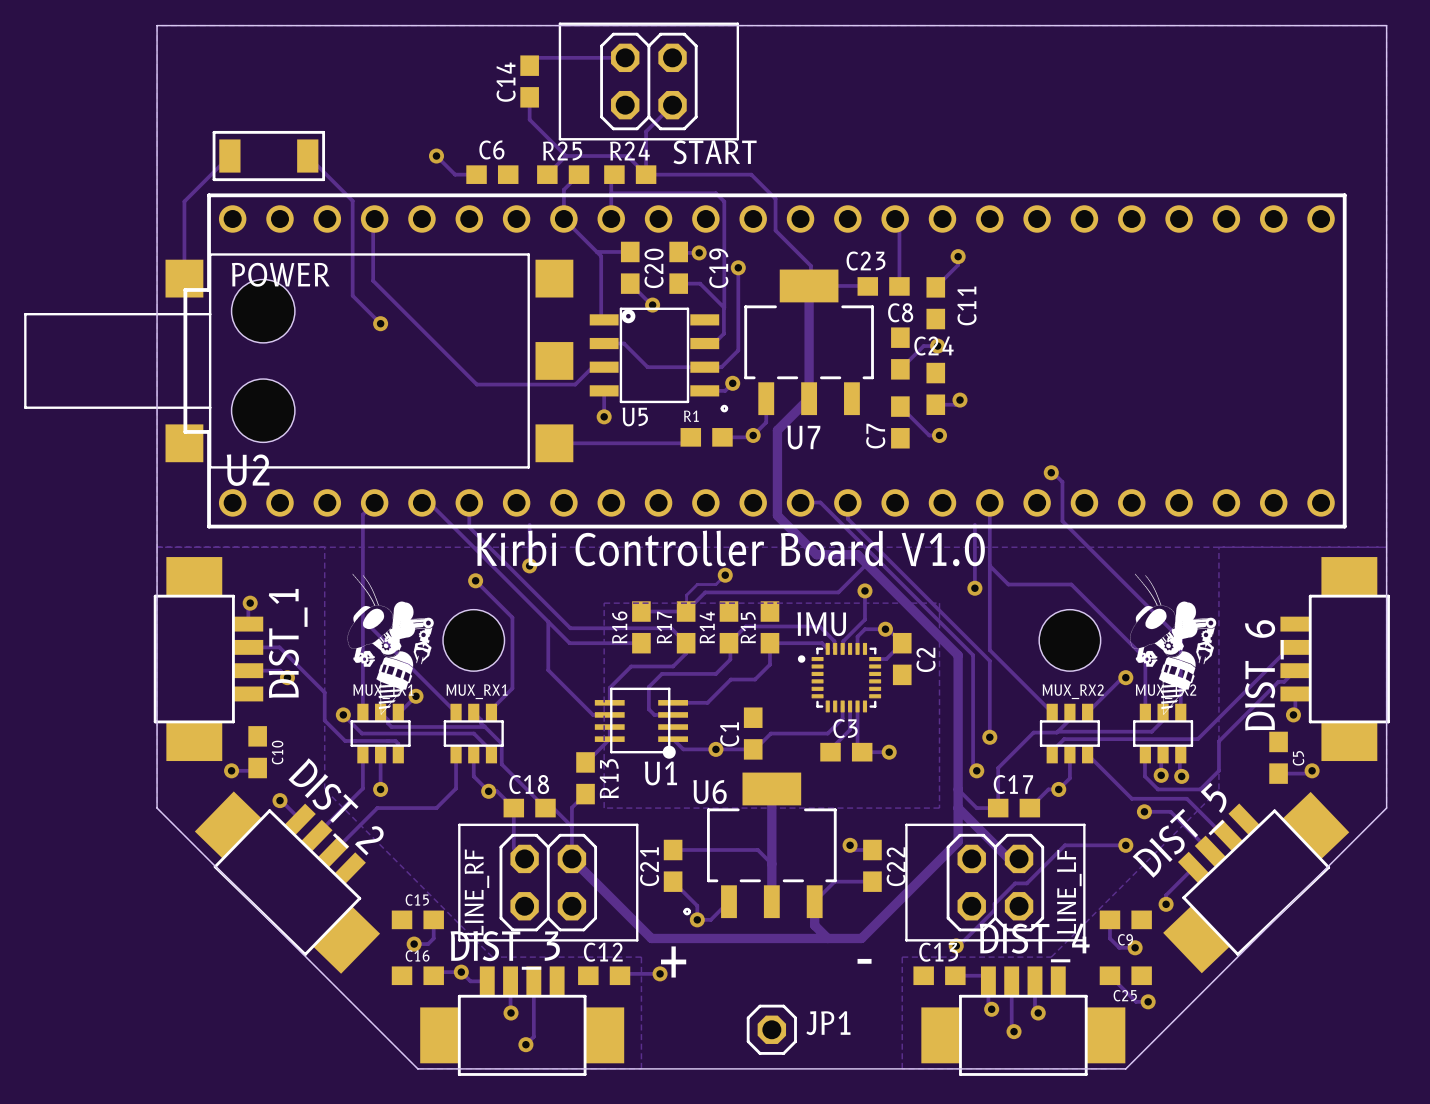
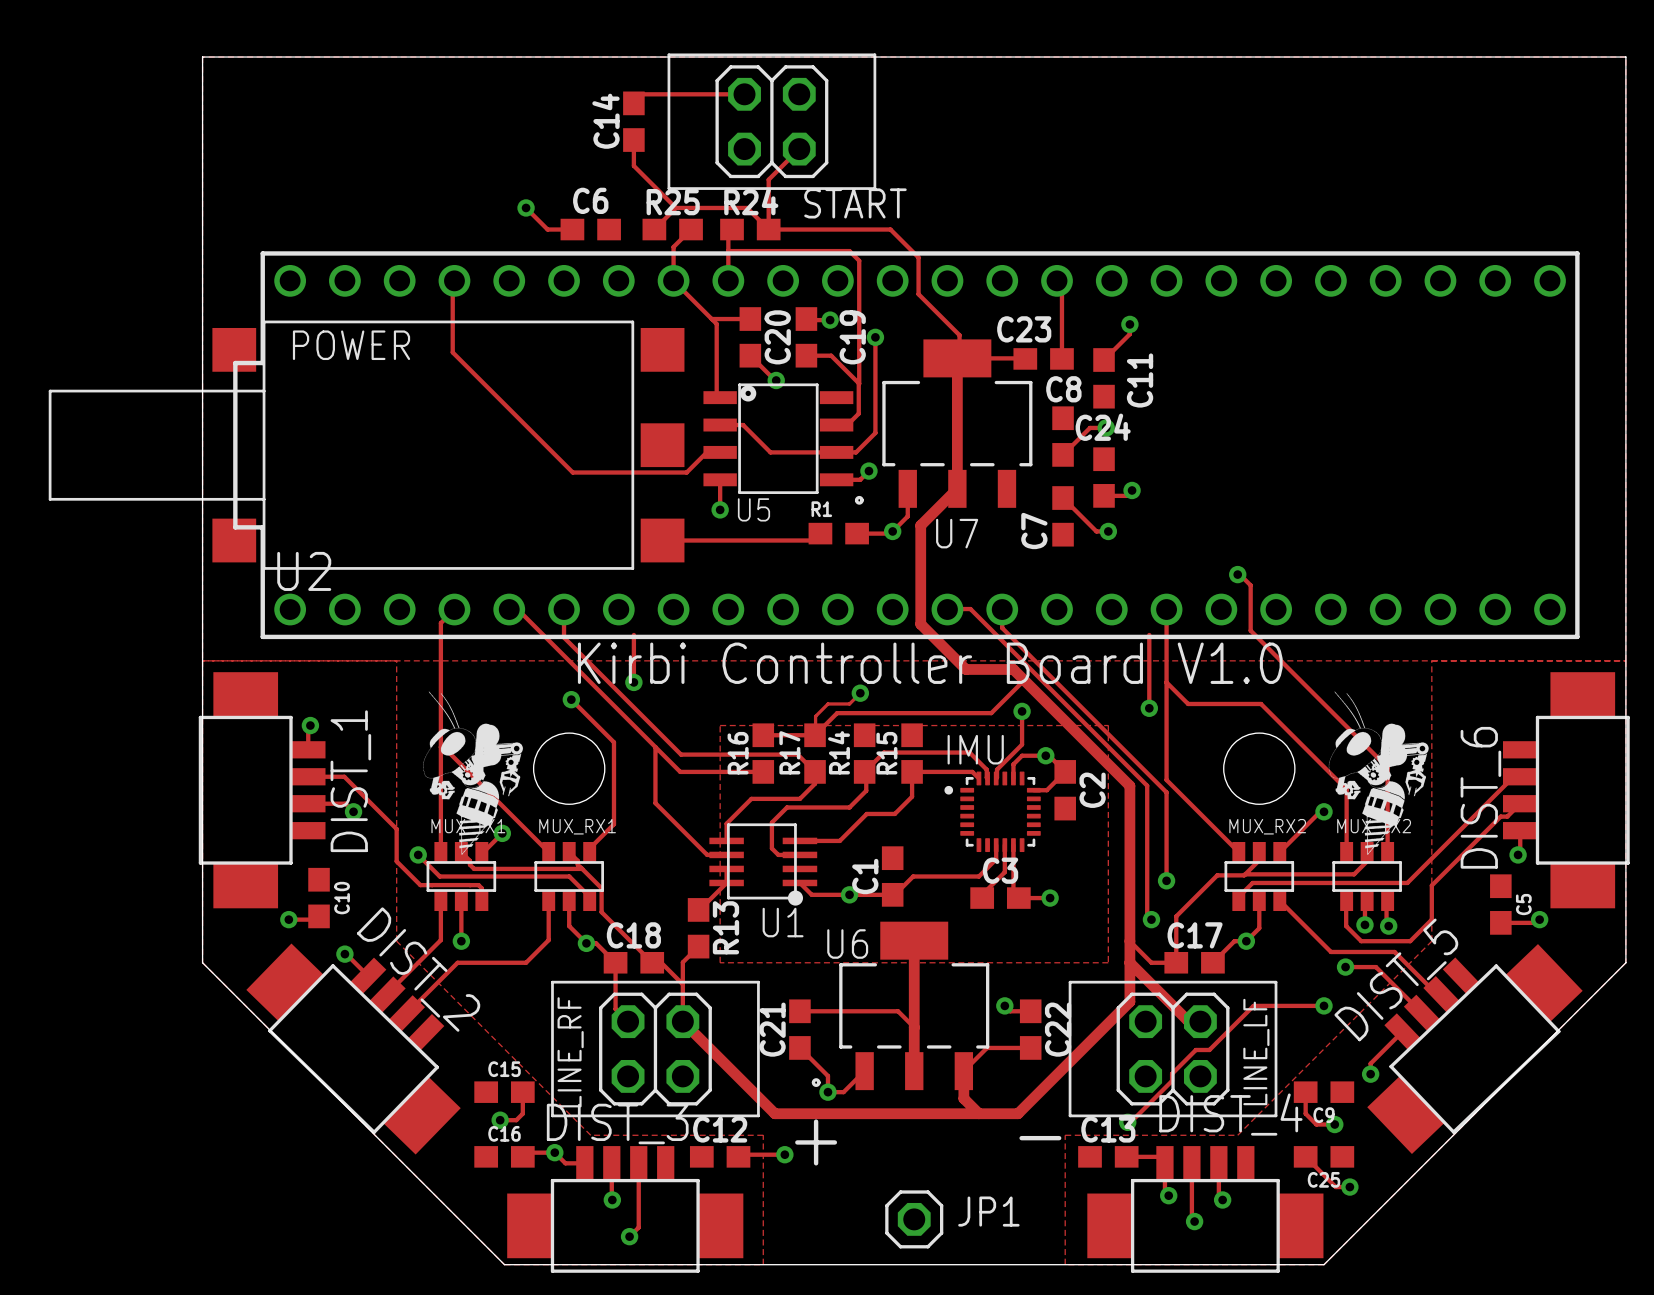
track: (229, 156) (184, 201) (184, 278) -> none
part: (268, 156) -> none
track: (307, 156) (352, 200) (352, 295) (380, 323) -> none
via: (380, 323) -> none
part: (263, 360) -> none

